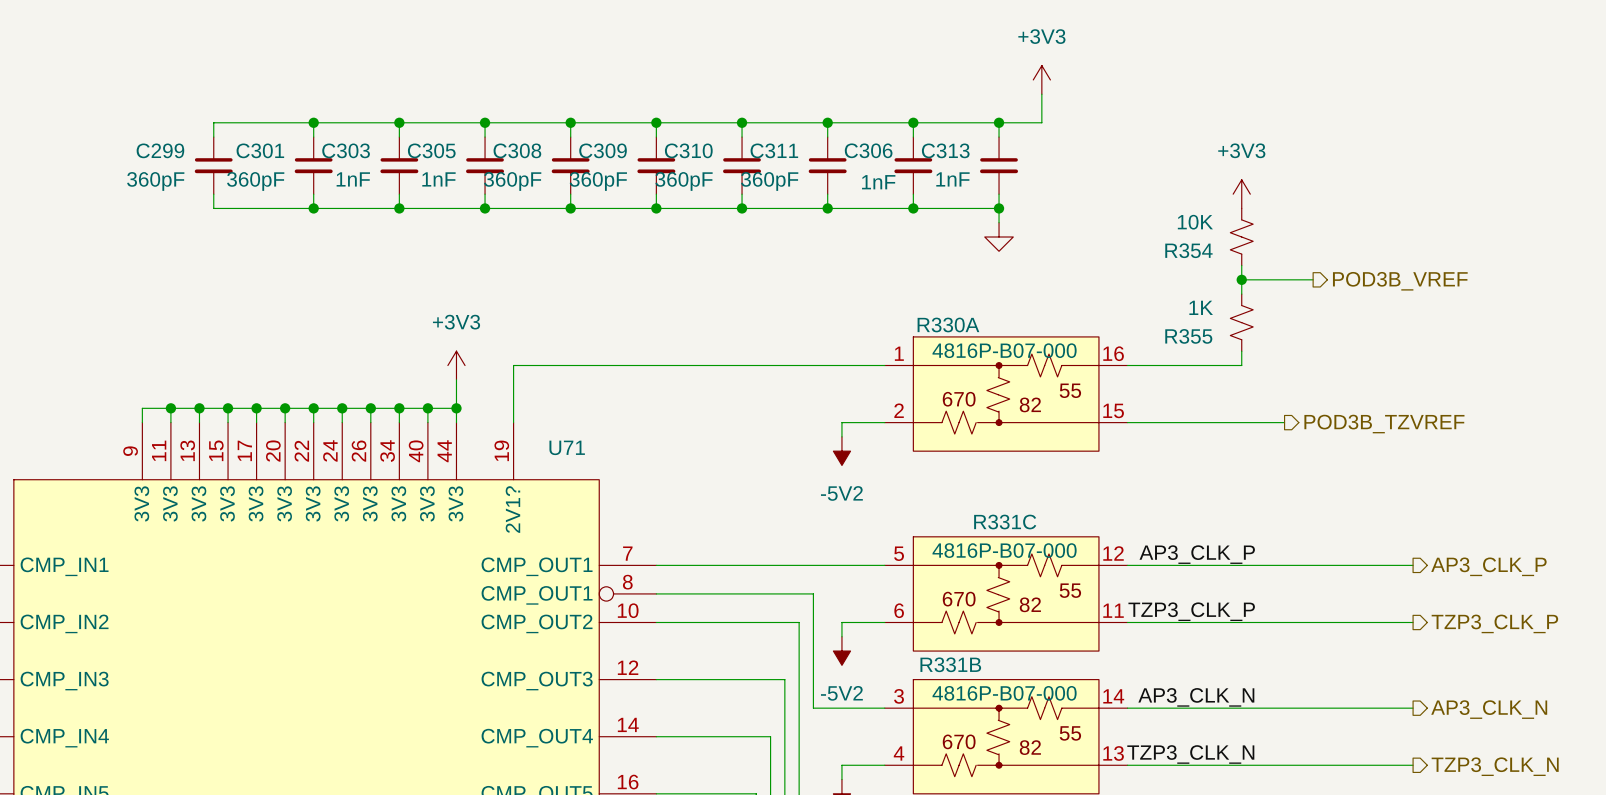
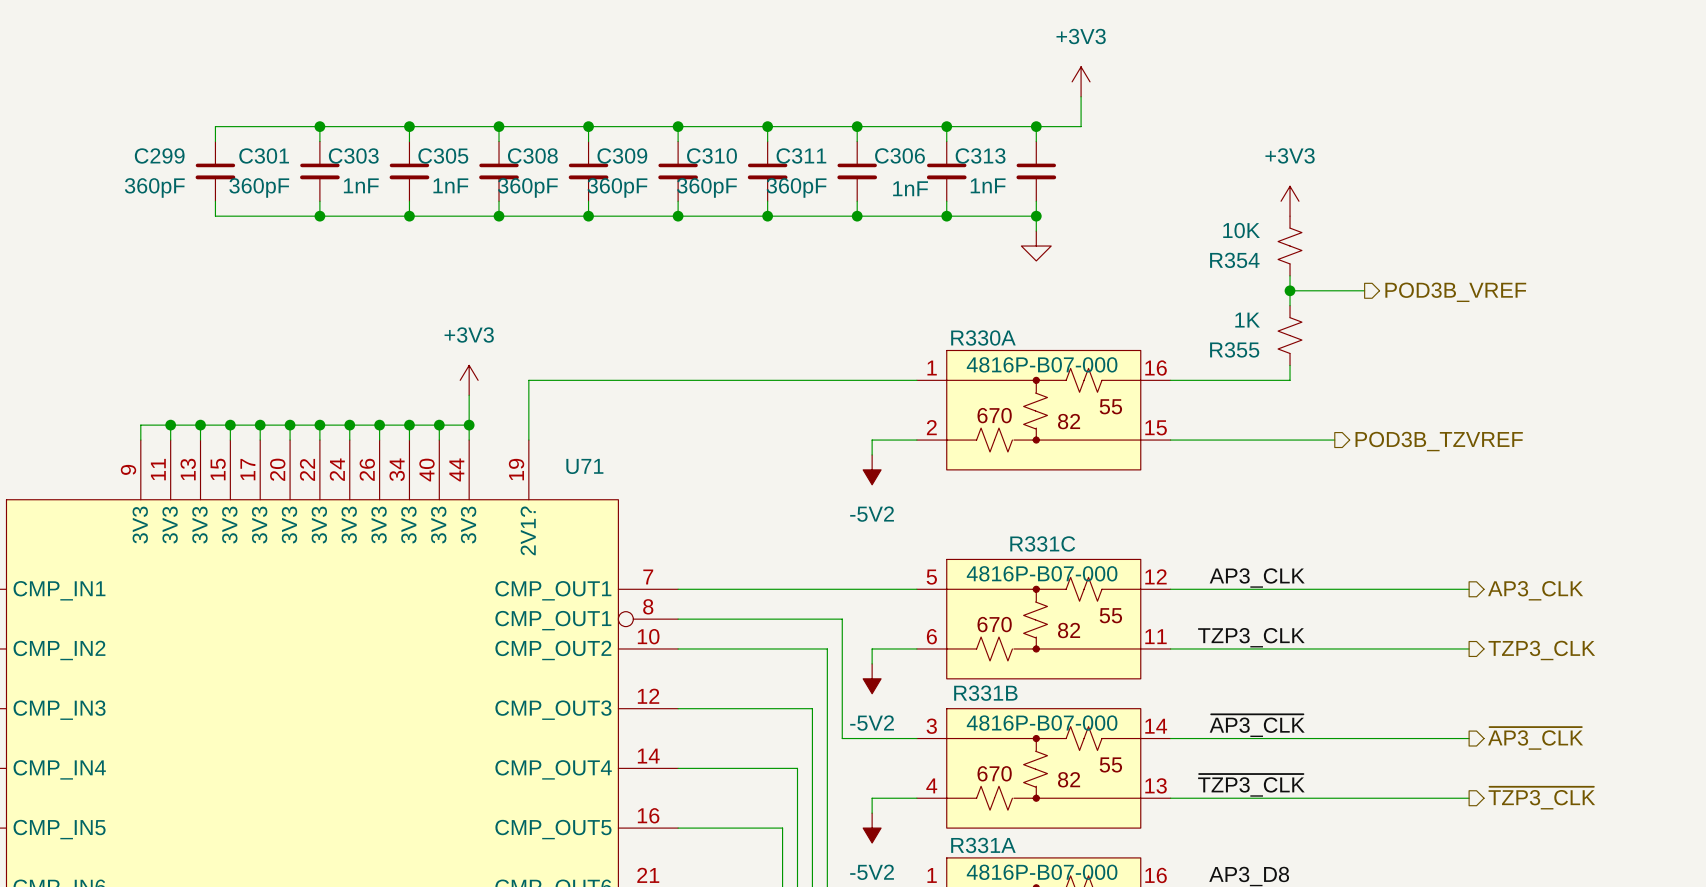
label: AP3_CLK_P (1197, 554) -> AP3_CLK (1257, 578)
hierarchical label: AP3_CLK_P (1488, 566) -> AP3_CLK (1535, 590)
label: TZP3_CLK_P (1191, 611) -> TZP3_CLK (1251, 637)
hierarchical label: TZP3_CLK_P (1494, 623) -> TZP3_CLK (1541, 650)
label: AP3_CLK_N (1196, 697) -> ~{AP3_CLK} (1257, 725)
hierarchical label: AP3_CLK_N (1489, 709) -> ~{AP3_CLK} (1535, 738)
label: TZP3_CLK_N (1190, 754) -> ~{TZP3_CLK} (1251, 785)
hierarchical label: TZP3_CLK_N (1495, 766) -> ~{TZP3_CLK} (1541, 798)

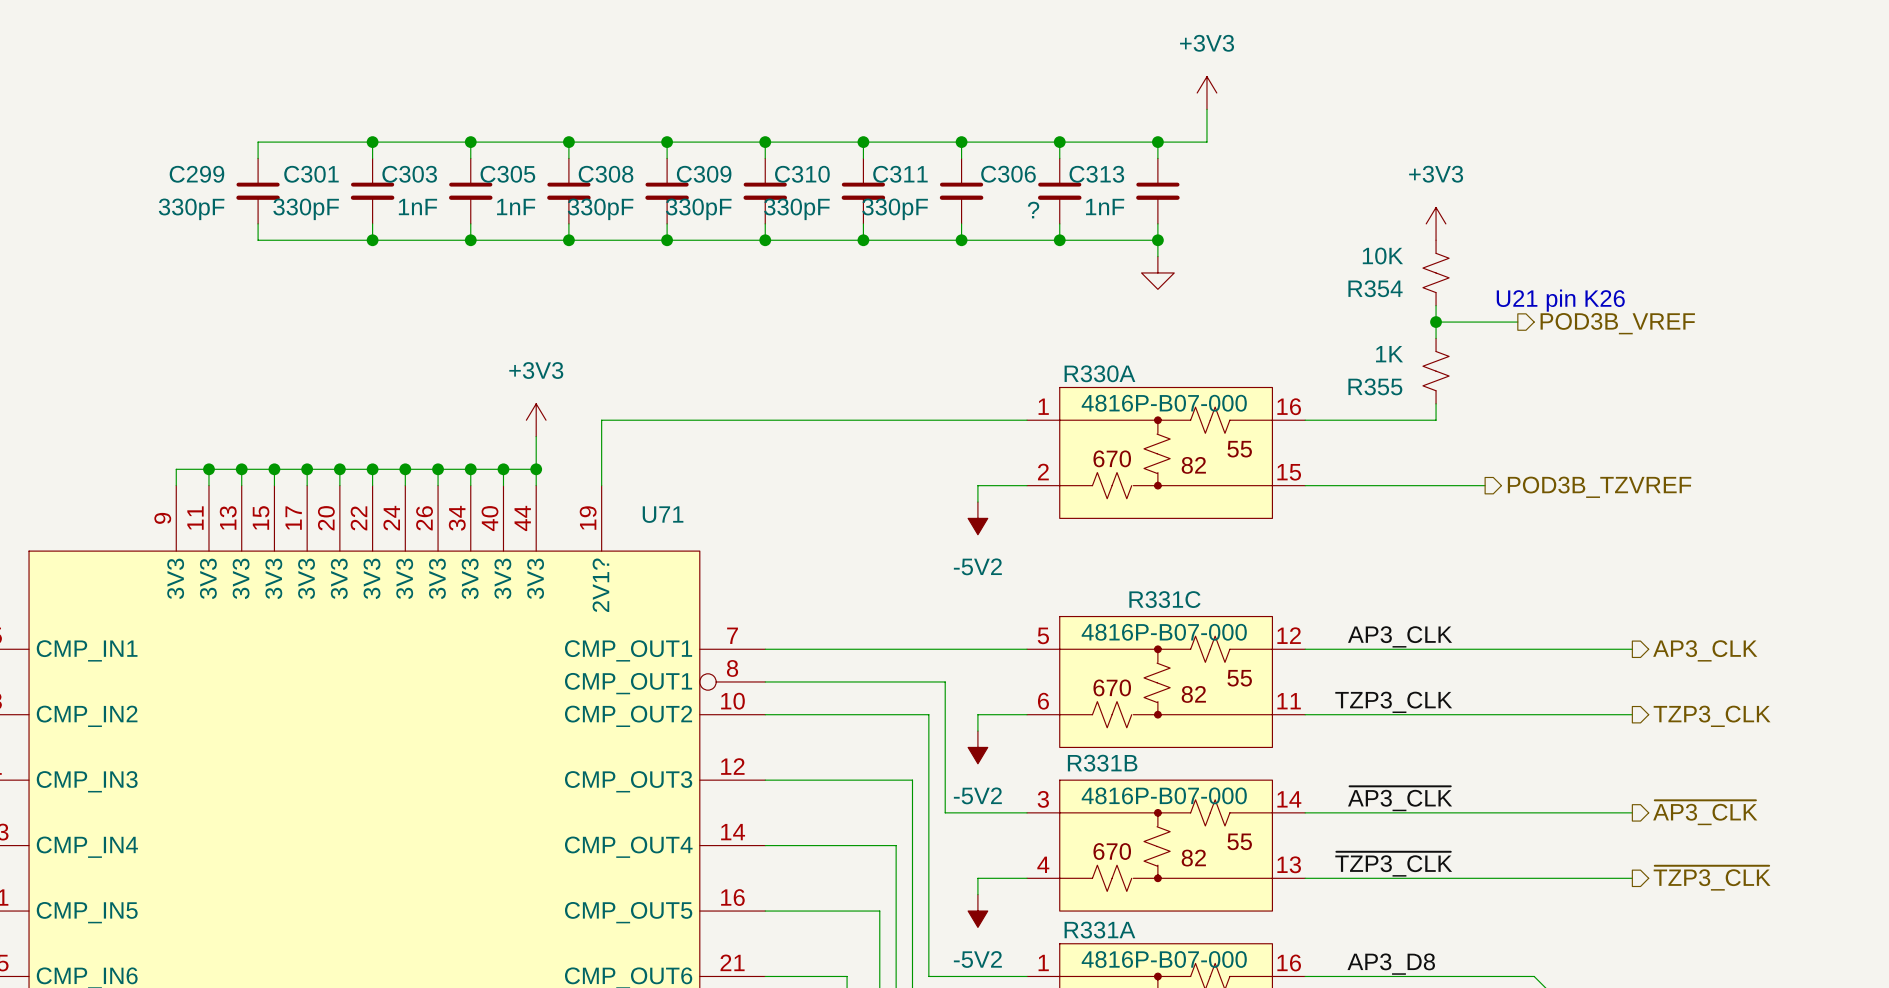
C299 value: 360pF (154, 187) -> 330pF (191, 209)
C301 value: 360pF (259, 187) -> 330pF (306, 209)
C308 value: 360pF (527, 187) -> 330pF (600, 209)
C309 value: 360pF (617, 187) -> 330pF (698, 209)
C310 value: 360pF (707, 187) -> 330pF (796, 209)
C311 value: 360pF (796, 187) -> 330pF (895, 209)
C306 value: 1nF (910, 188) -> ? (1033, 210)
text: none -> U21 pin K26 (1560, 300)

